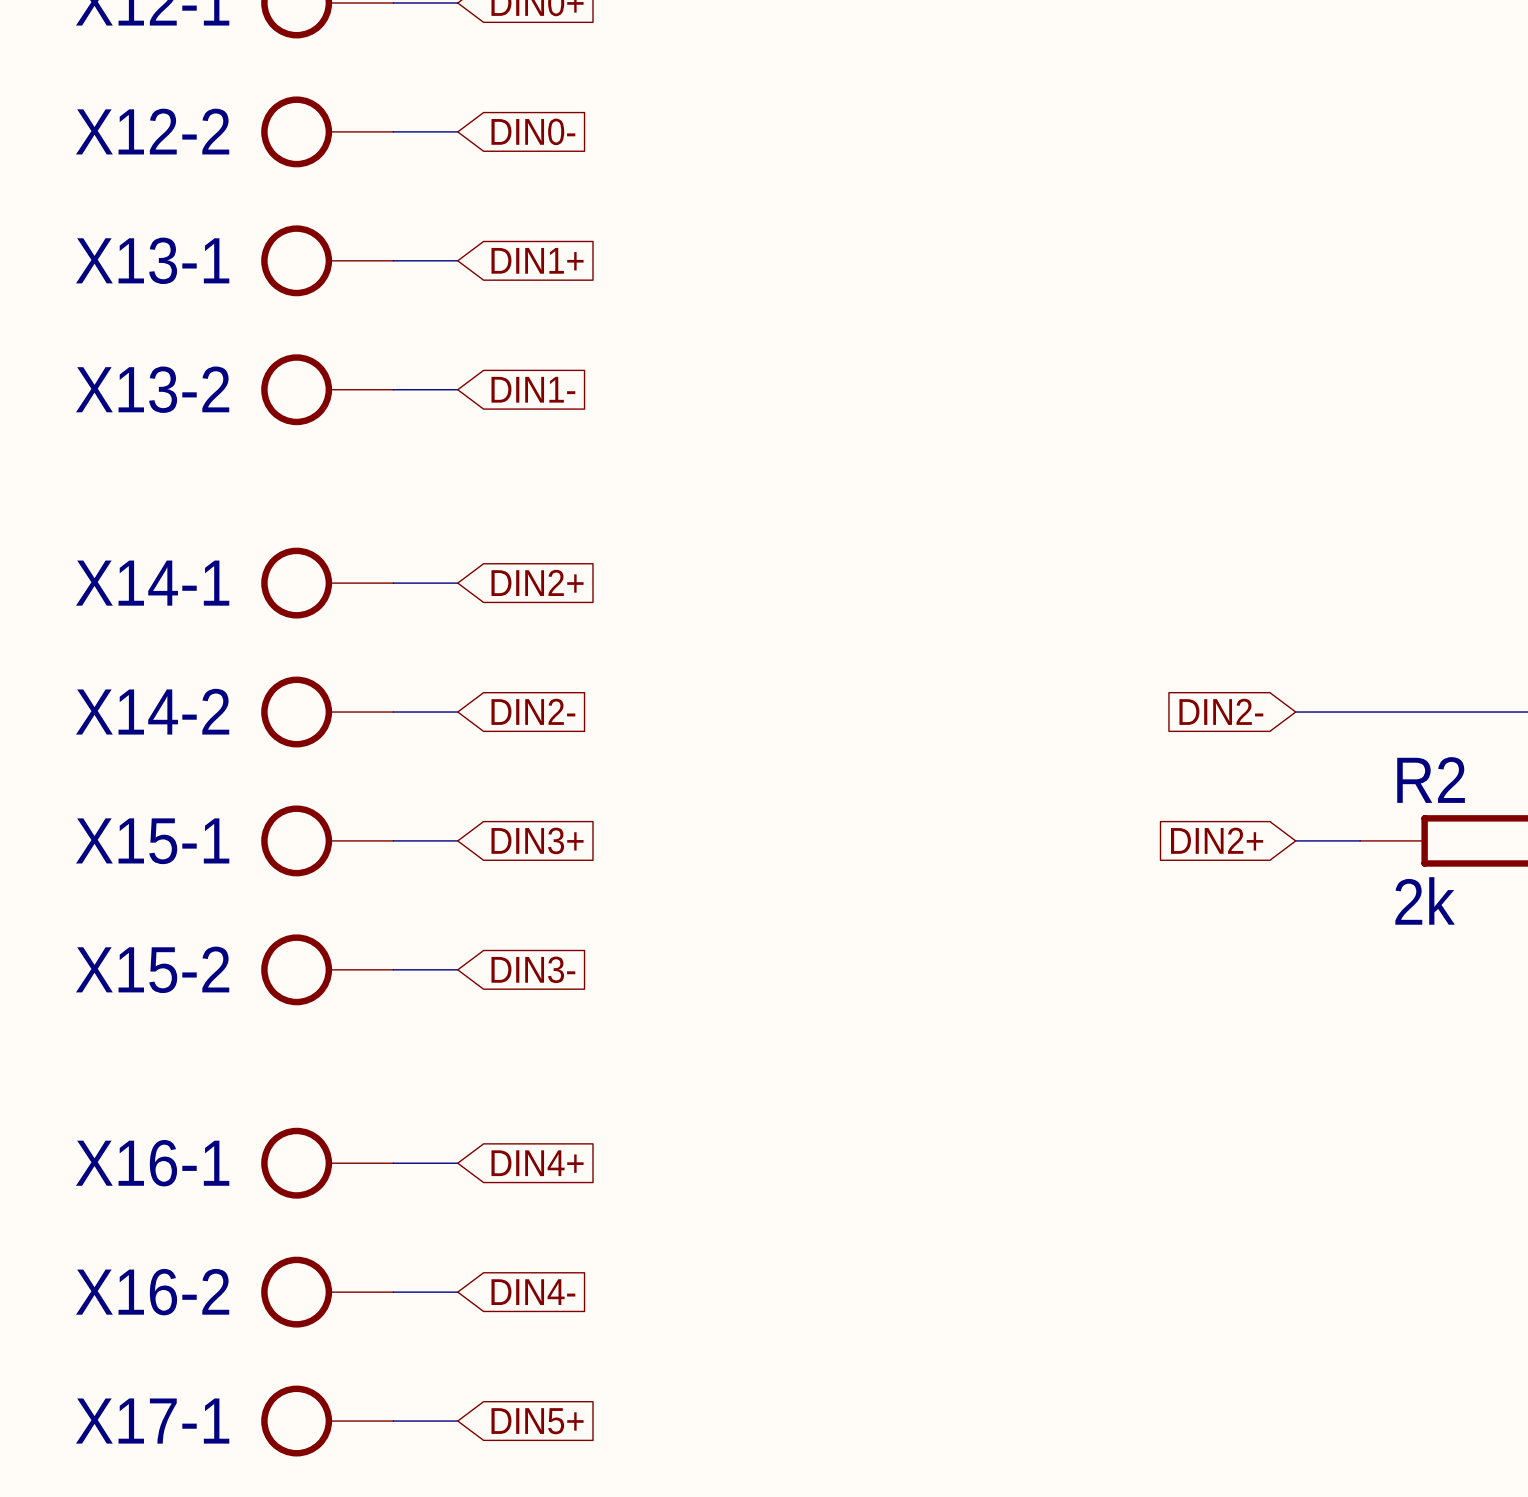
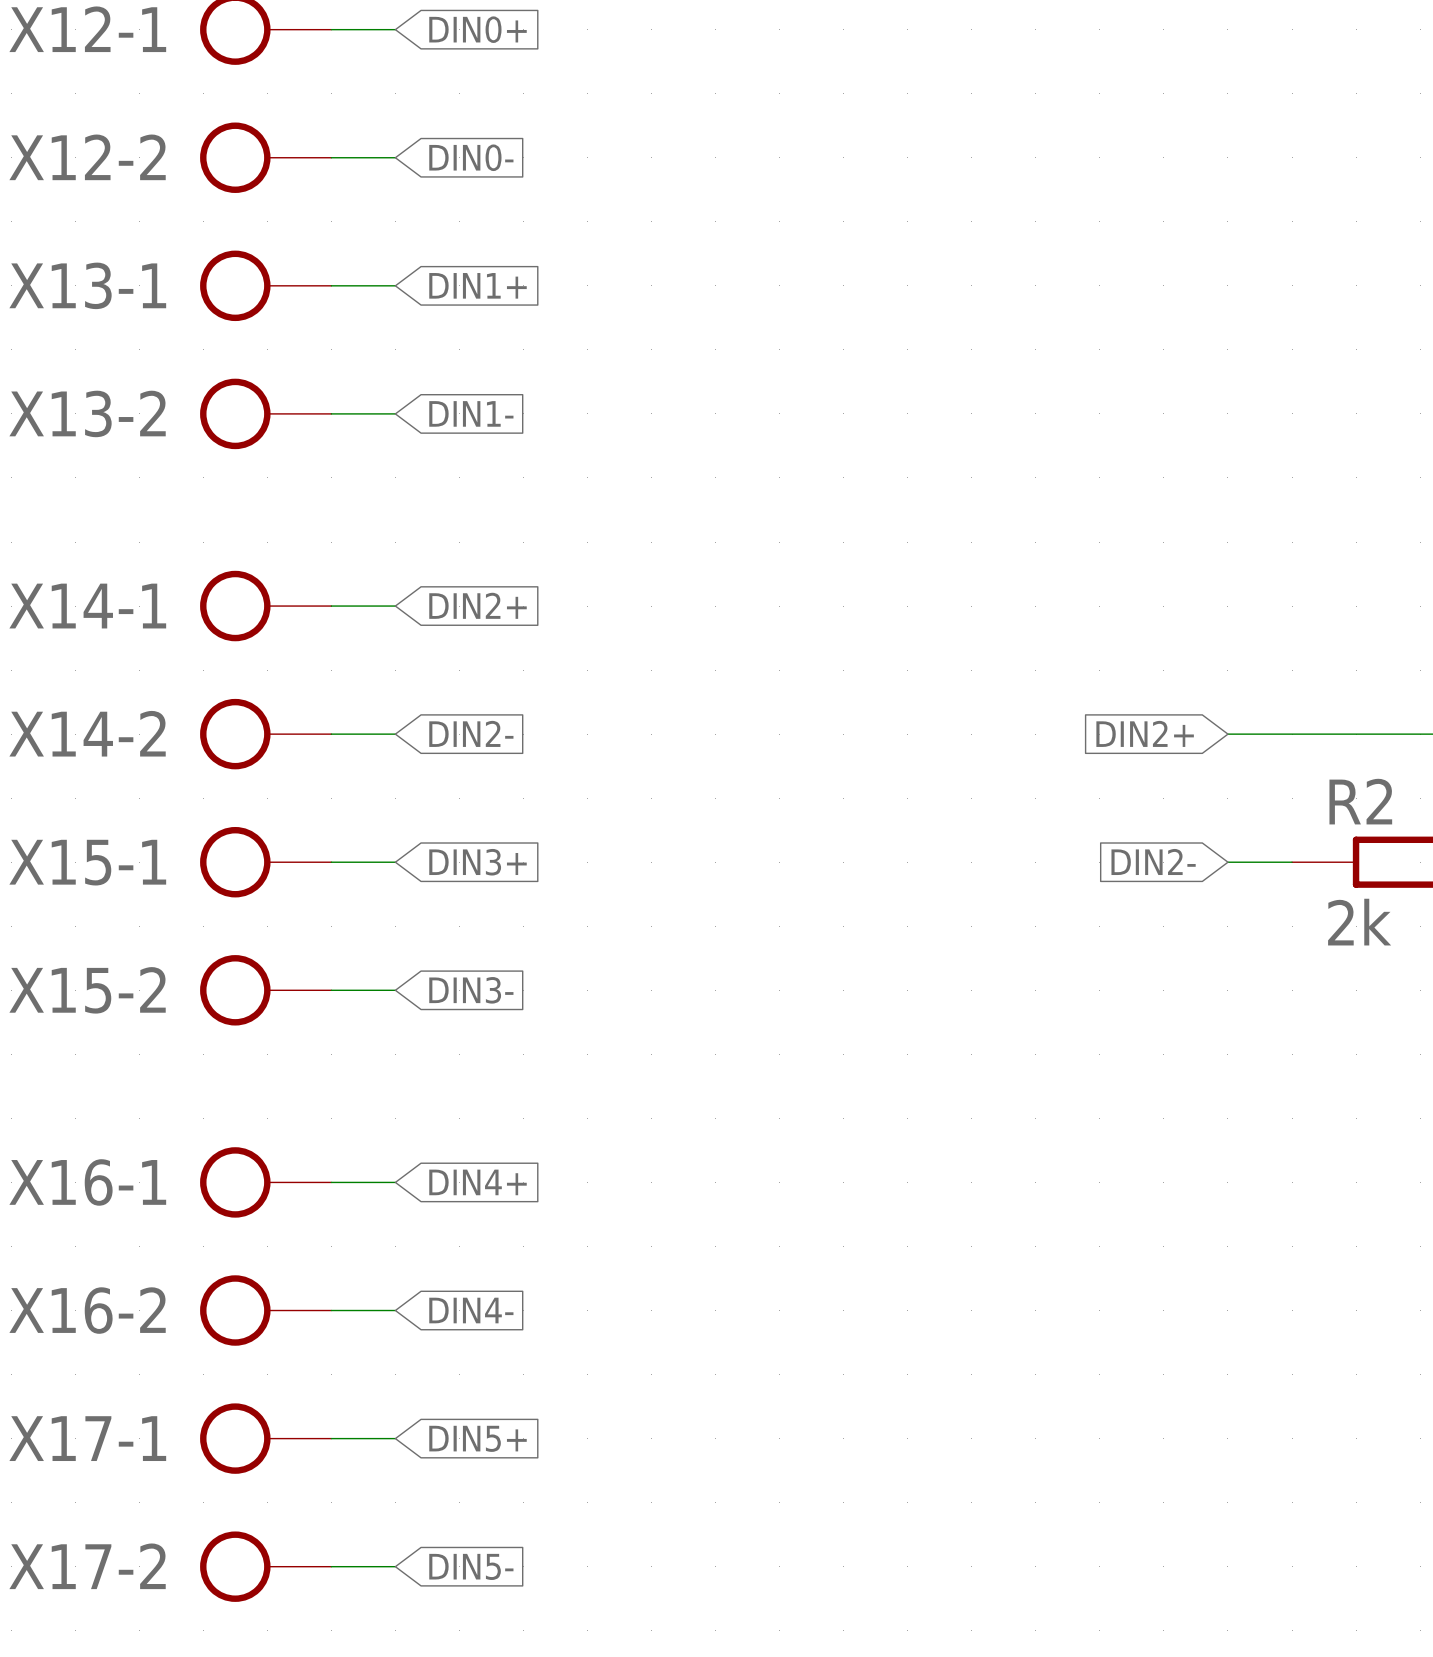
global label: DIN2- (1221, 711) -> DIN2+ (1145, 733)
global label: DIN2+ (1217, 840) -> DIN2- (1153, 861)

